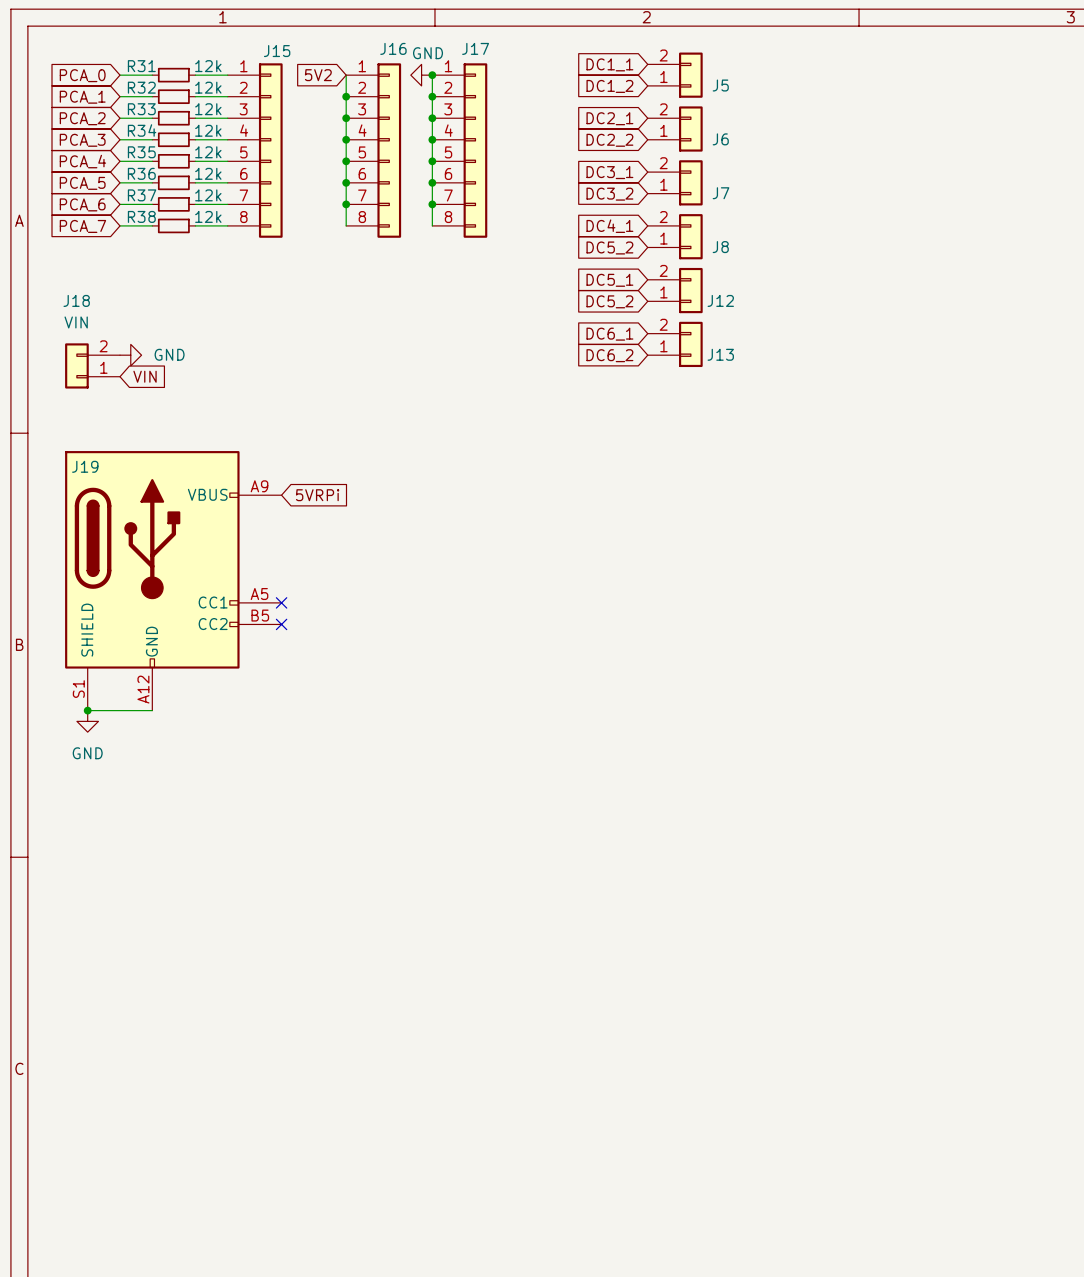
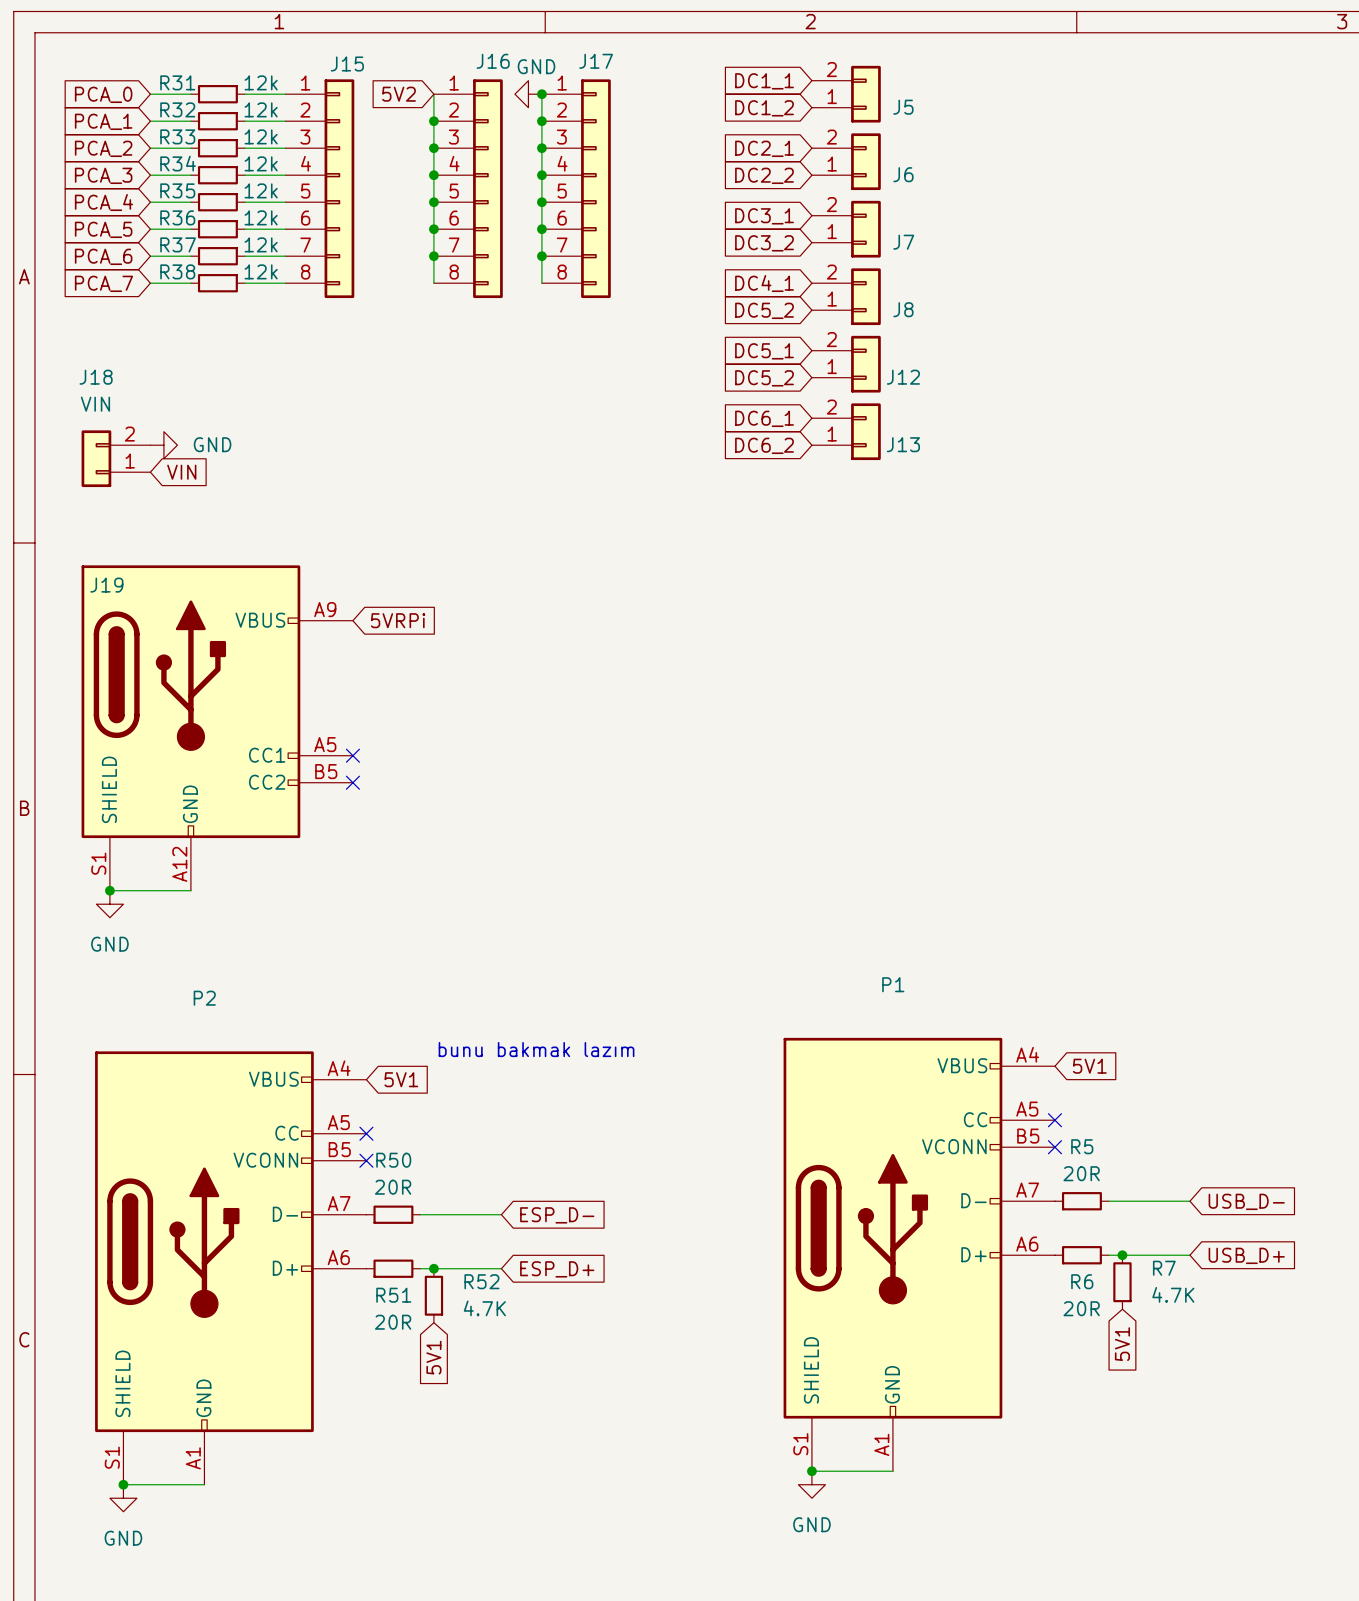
text: none -> bunu bakmak lazım (536, 1049)
global label: none -> 5V1 (1089, 1066)
global label: none -> 5V1 (401, 1079)
no-connect mark: none -> (1054, 1120)
no-connect mark: none -> (366, 1133)
no-connect mark: none -> (1054, 1147)
no-connect mark: none -> (366, 1160)
R5: none -> 20R (1081, 1201)
wire: none -> (1108, 1201) (1189, 1201)
global label: none -> USB_D- (1246, 1201)
R50: none -> 20R (393, 1214)
wire: none -> (420, 1214) (501, 1214)
global label: none -> ESP_D- (557, 1215)
P1: none -> (919, 1254)
R6: none -> 20R (1081, 1255)
wire: none -> (1108, 1255) (1189, 1255)
junction: none -> (1122, 1255)
global label: none -> USB_D+ (1246, 1255)
P2: none -> (230, 1268)
R51: none -> 20R (393, 1268)
wire: none -> (420, 1268) (501, 1268)
junction: none -> (433, 1268)
global label: none -> ESP_D+ (557, 1269)
R7: none -> 4.7K (1122, 1282)
R52: none -> 4.7K (433, 1295)
global label: none -> 5V1 (1122, 1344)
global label: none -> 5V1 (433, 1357)
wire: none -> (811, 1471) (892, 1471)
junction: none -> (811, 1471)
wire: none -> (123, 1484) (204, 1484)
junction: none -> (123, 1484)
power symbol: none -> GND (811, 1484)
power symbol: none -> GND (123, 1498)

